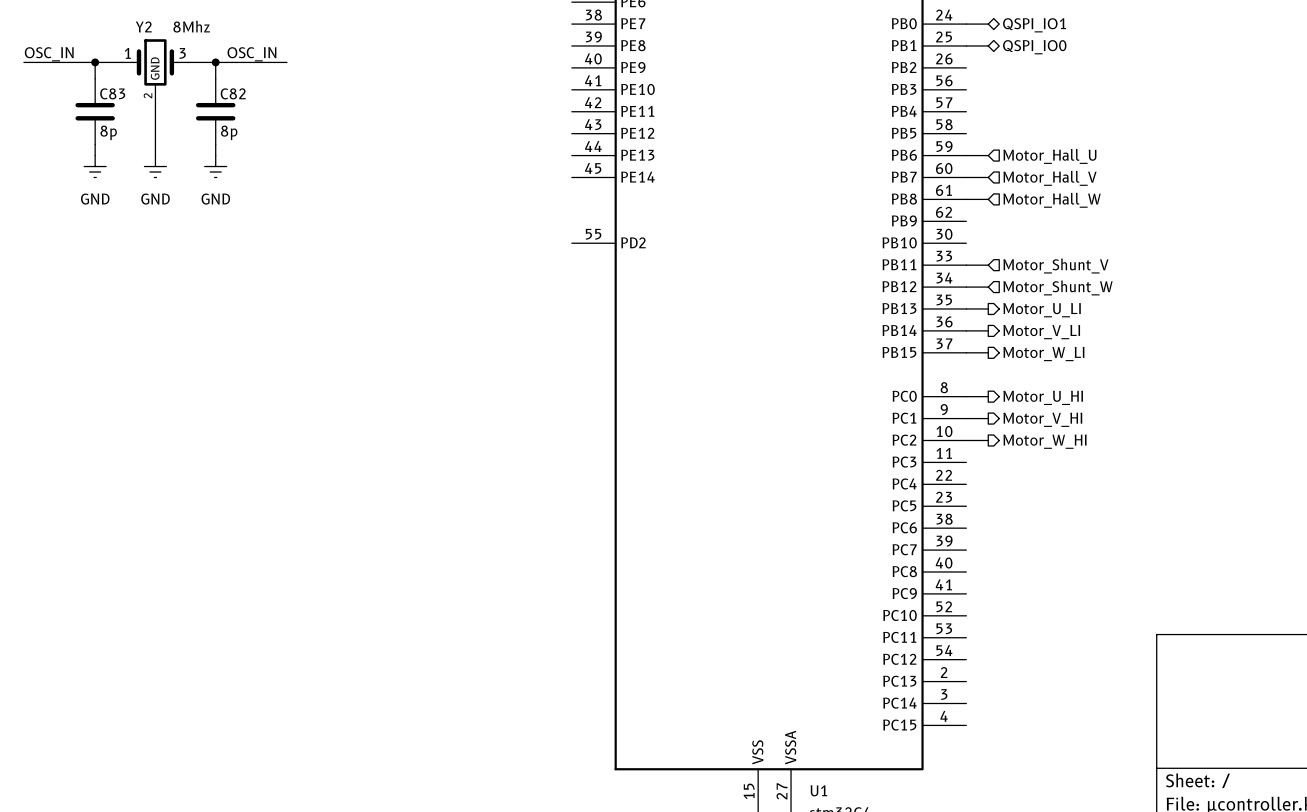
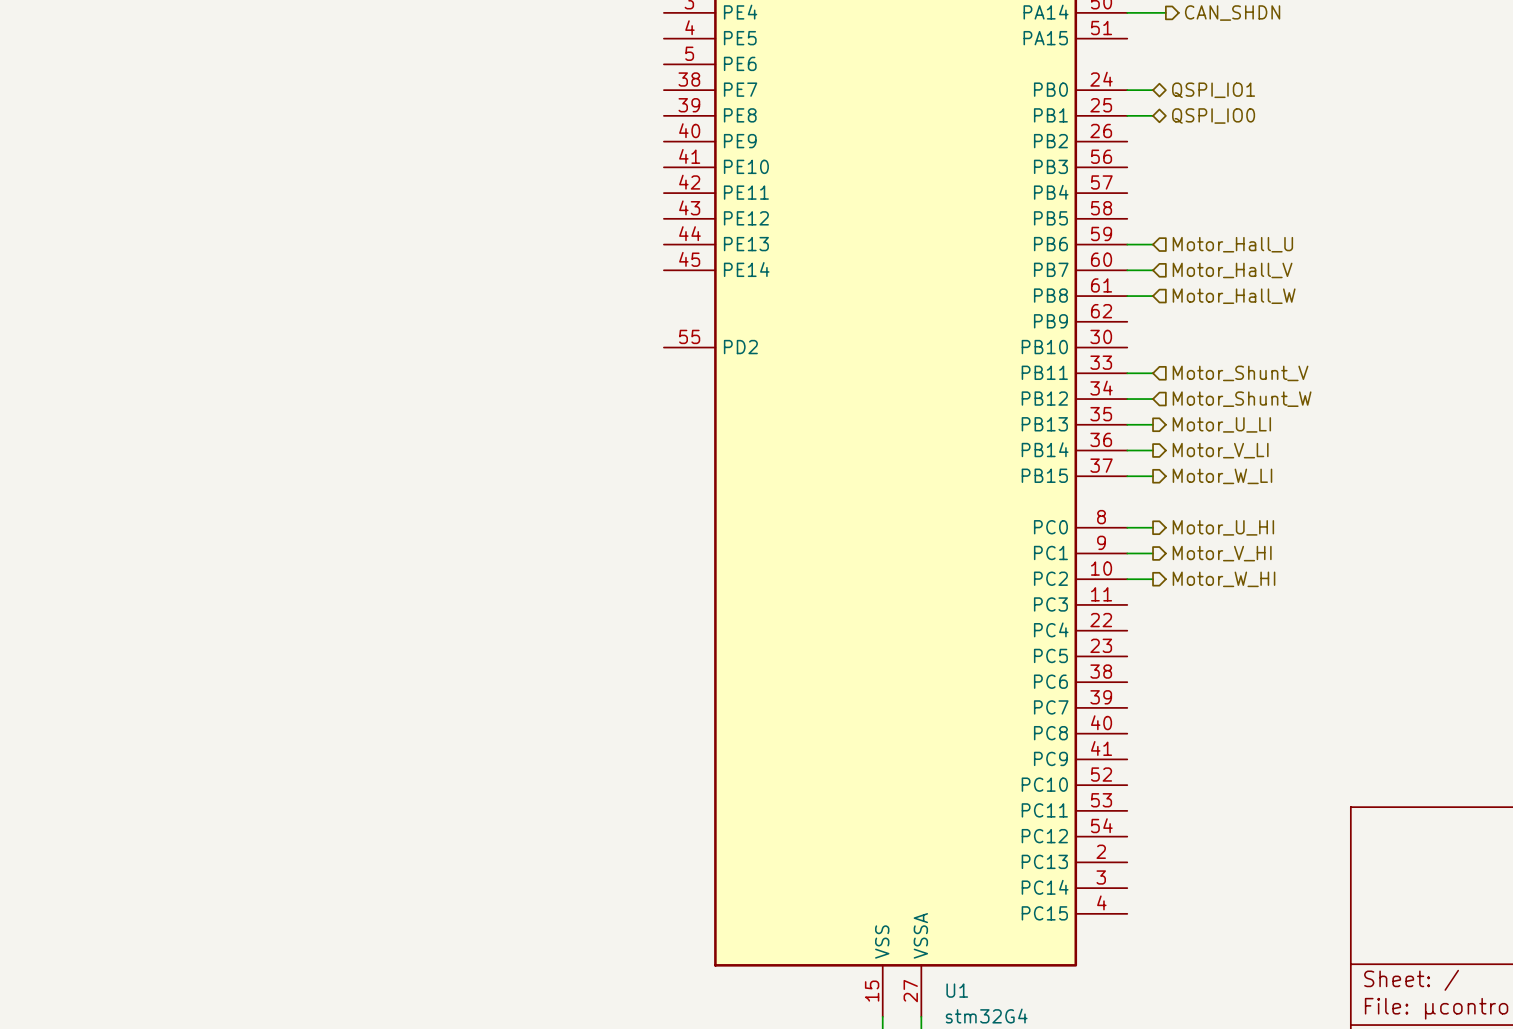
label: OSC_IN (49, 54) -> none
label: OSC_IN (251, 54) -> none
wire: (23, 62) (122, 62) -> none
wire: (95, 62) (95, 78) -> none
junction: (95, 62) -> none
wire: (188, 62) (286, 62) -> none
wire: (215, 62) (215, 78) -> none
junction: (215, 62) -> none
Y2: 8Mhz (155, 72) -> none
wire: (155, 106) (155, 155) -> none
C83: 8p (95, 111) -> none
C82: 8p (215, 111) -> none
wire: (95, 144) (95, 155) -> none
wire: (215, 144) (215, 155) -> none
power symbol: GND (95, 166) -> none
power symbol: GND (155, 166) -> none
power symbol: GND (215, 166) -> none

